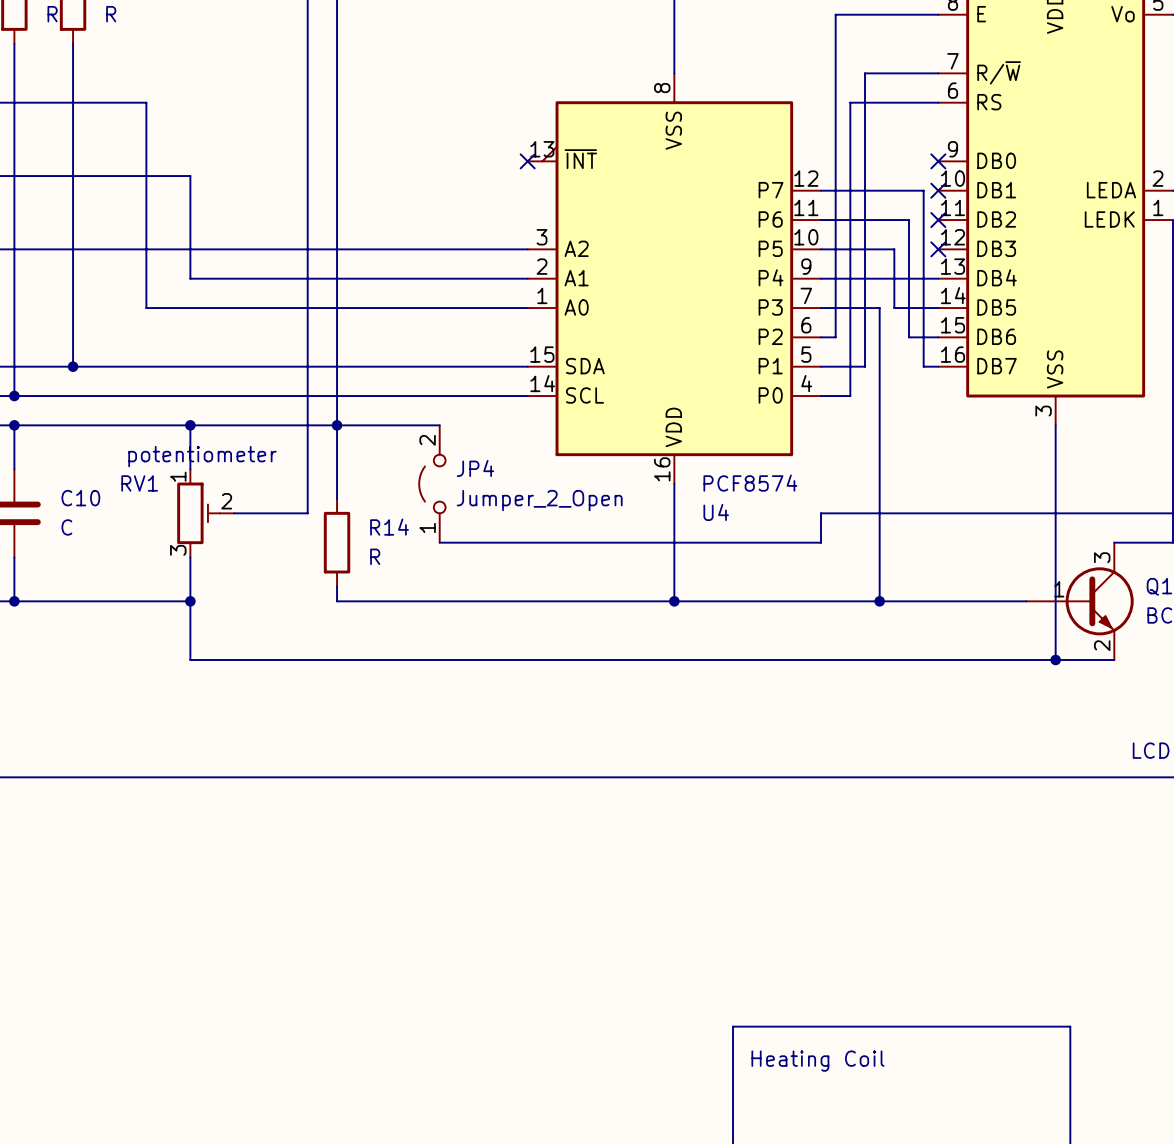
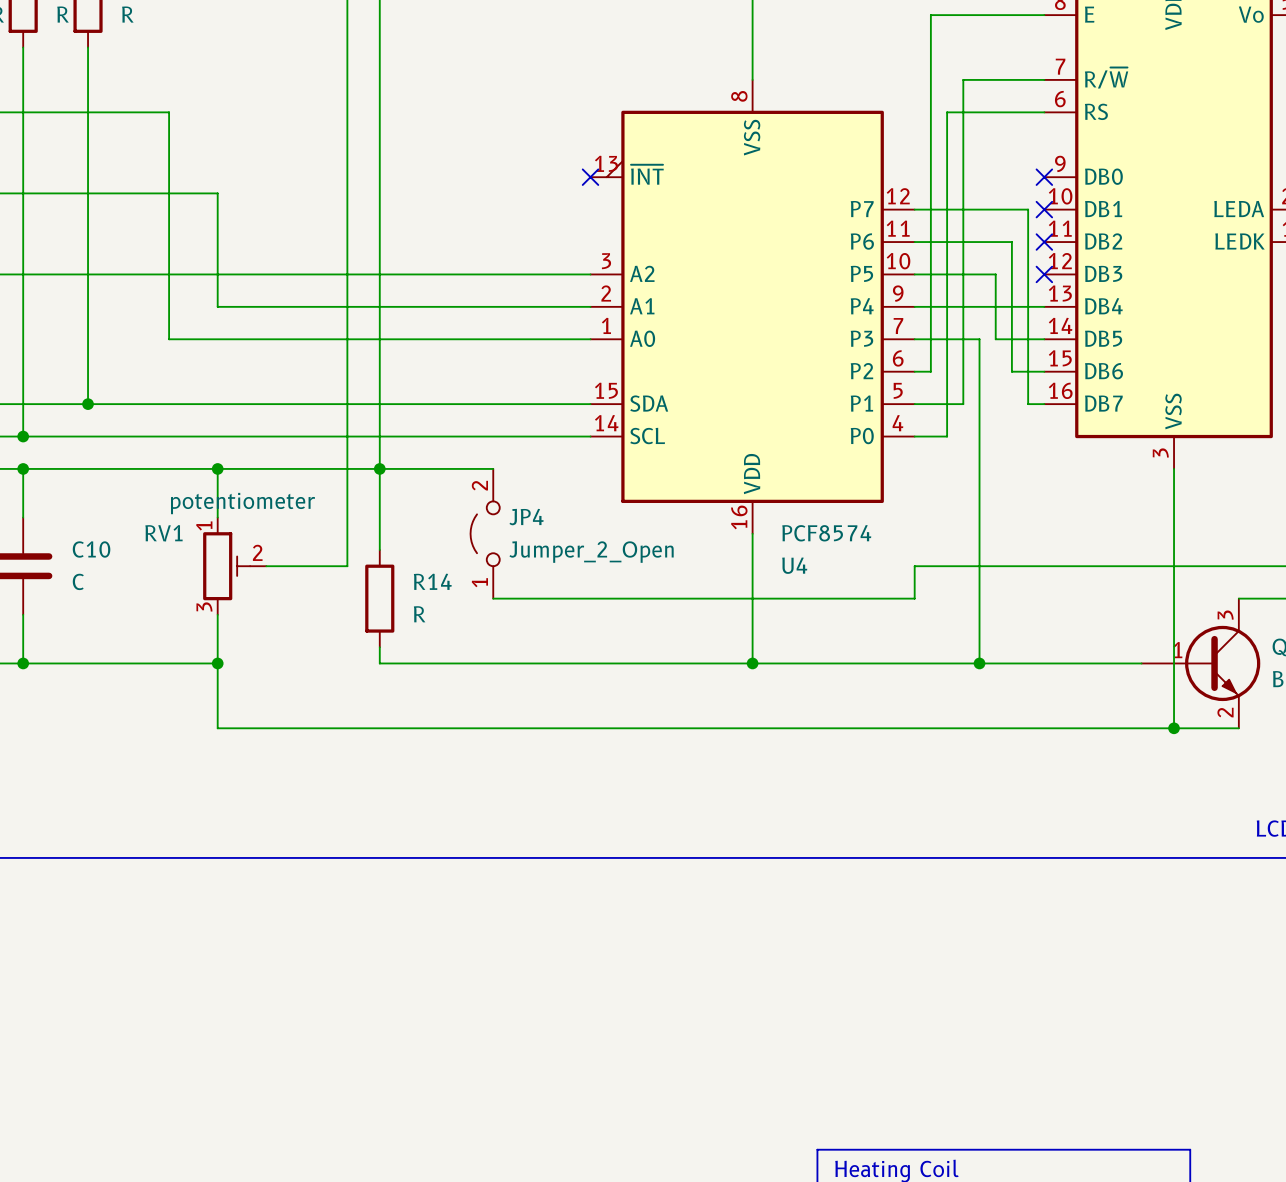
line: (733, 1041) (733, 1026) (1070, 1026) (1070, 1041) -> (817, 1149) (1190, 1149)

